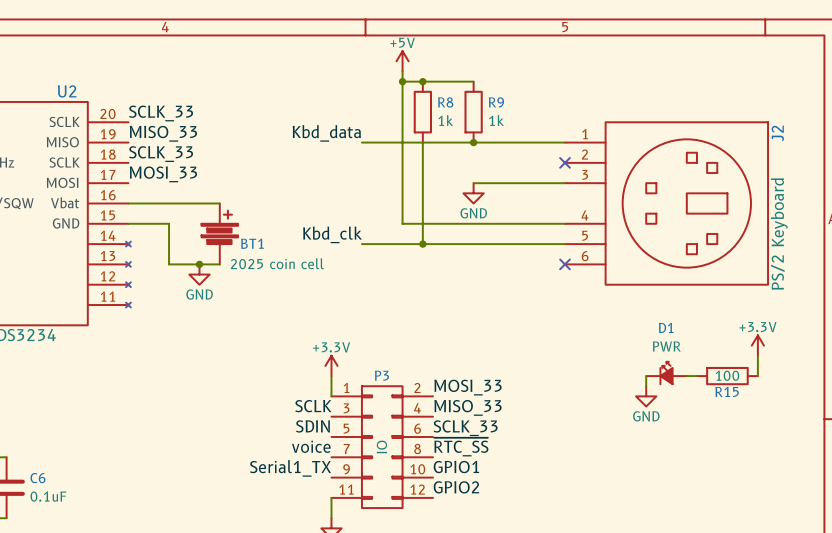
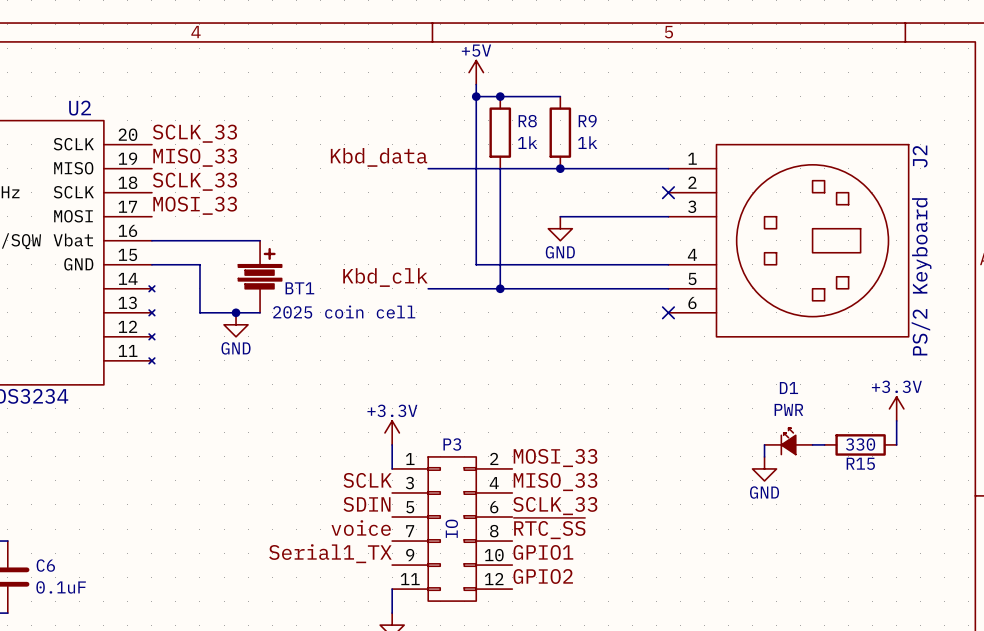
R15 value: 100 (727, 375) -> 330 (860, 444)

